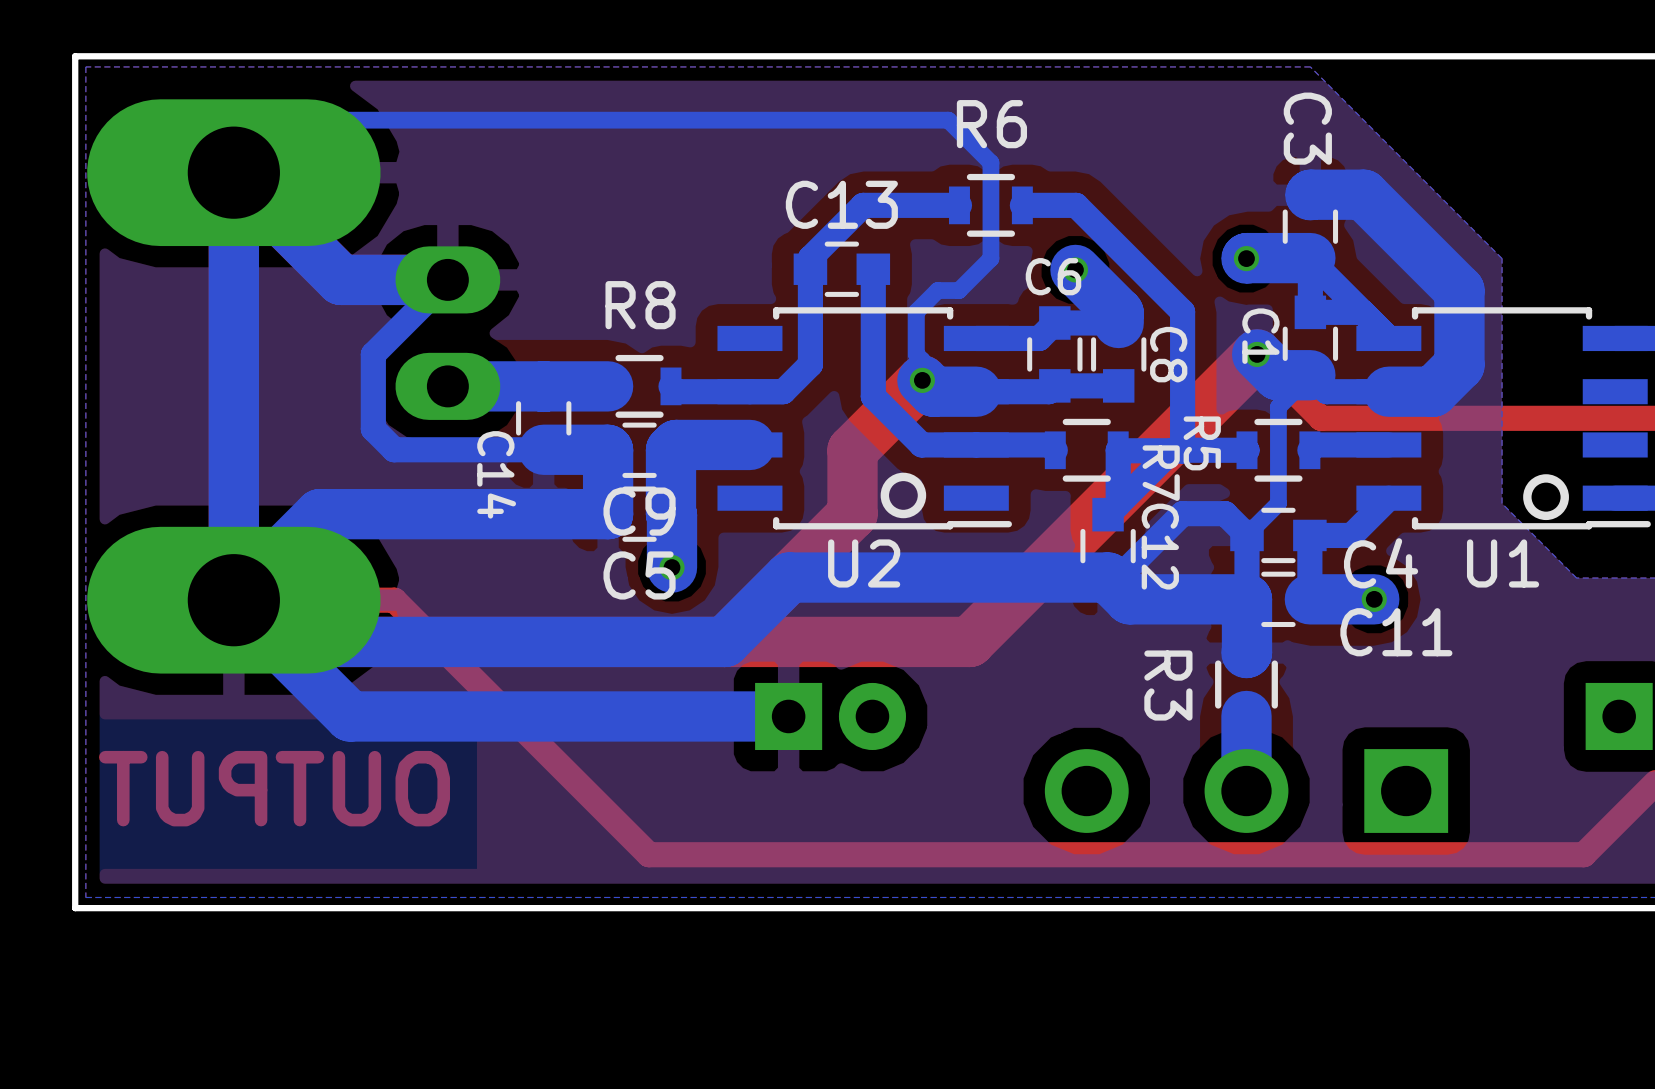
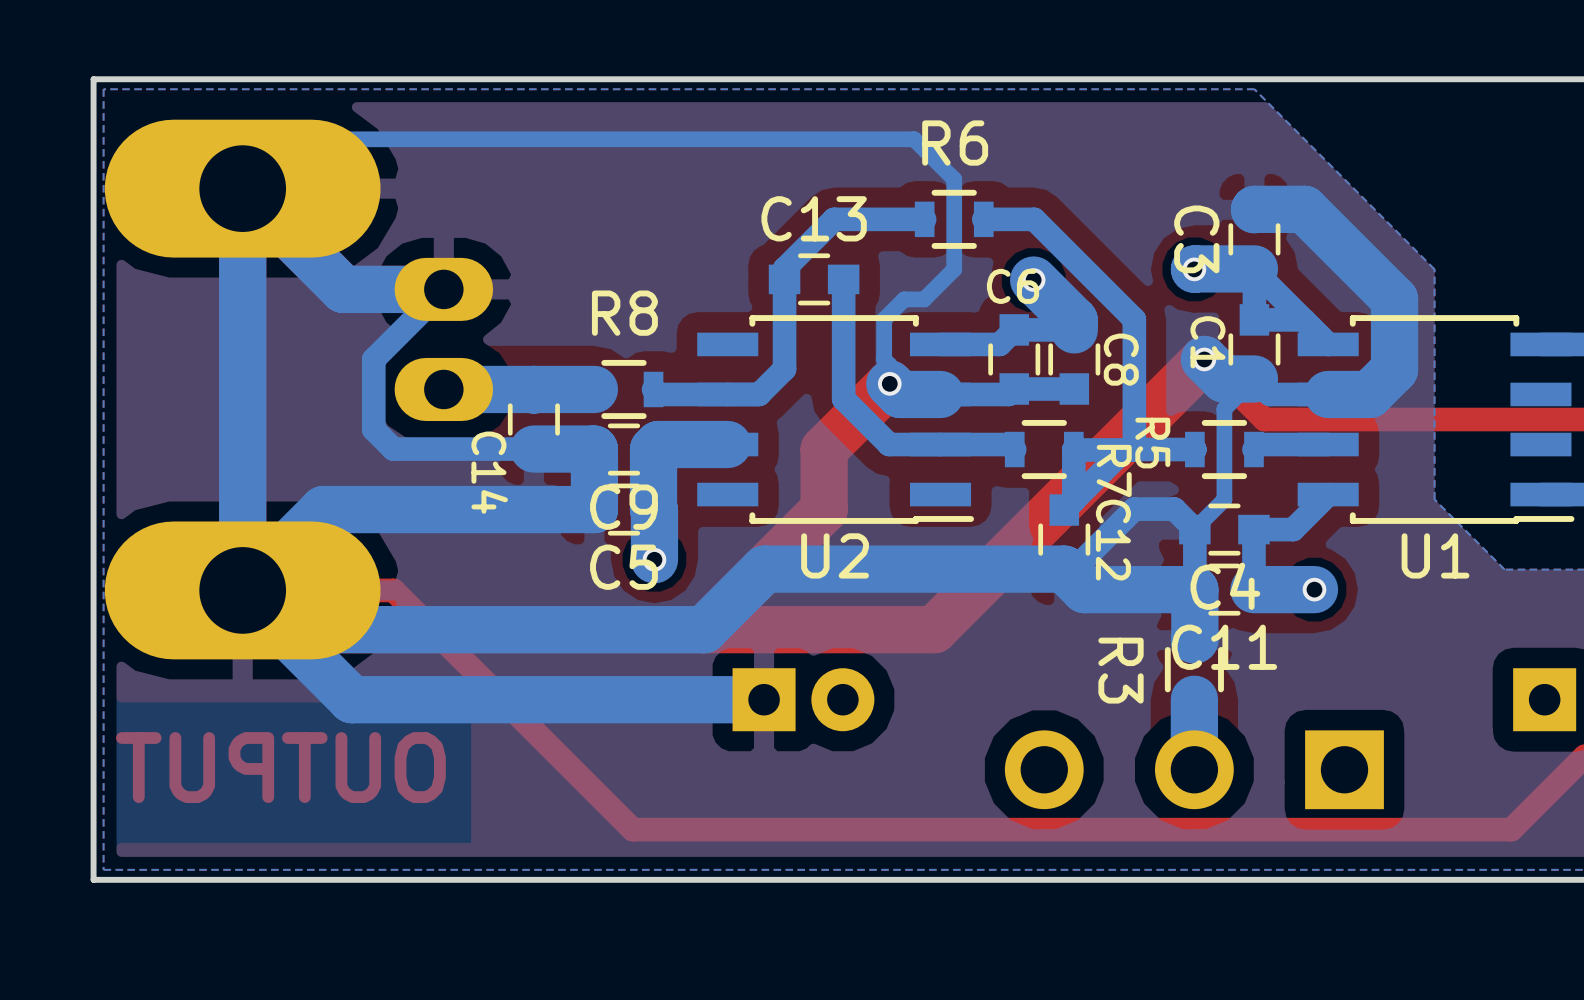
C3 name position: C3 (1307, 128) -> C3 (1196, 239)
drawing: [880, 472, 927, 519] -> none
drawing: [1523, 474, 1569, 521] -> none
C4 name position: C4 (1381, 563) -> C4 (1225, 586)
C11 name position: C11 (1396, 632) -> C11 (1224, 647)

